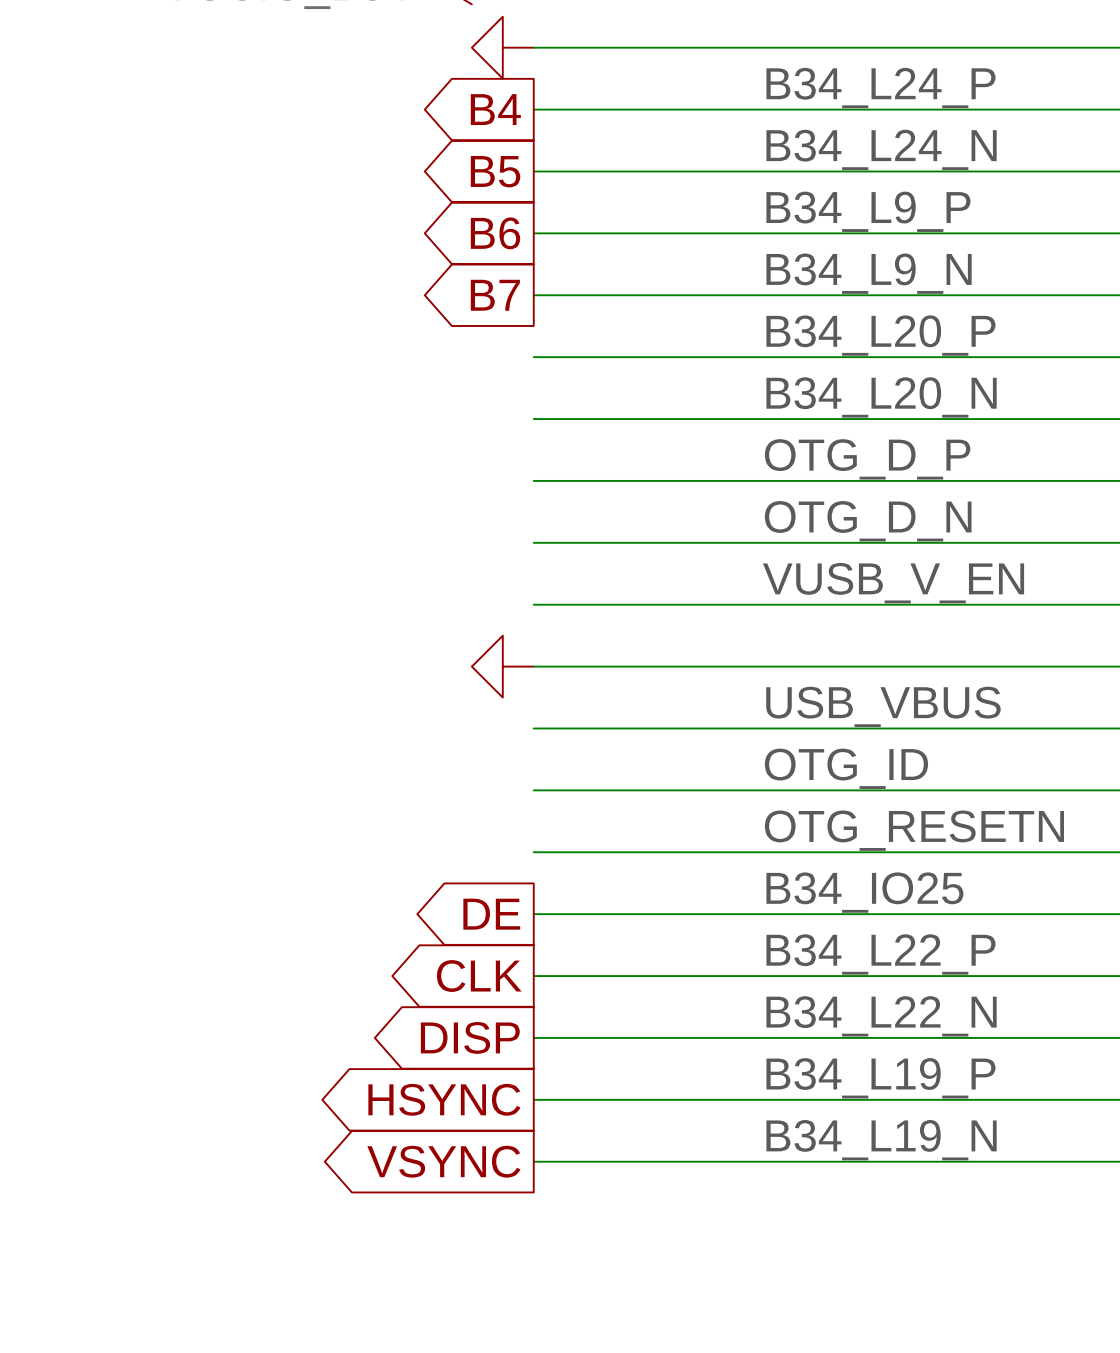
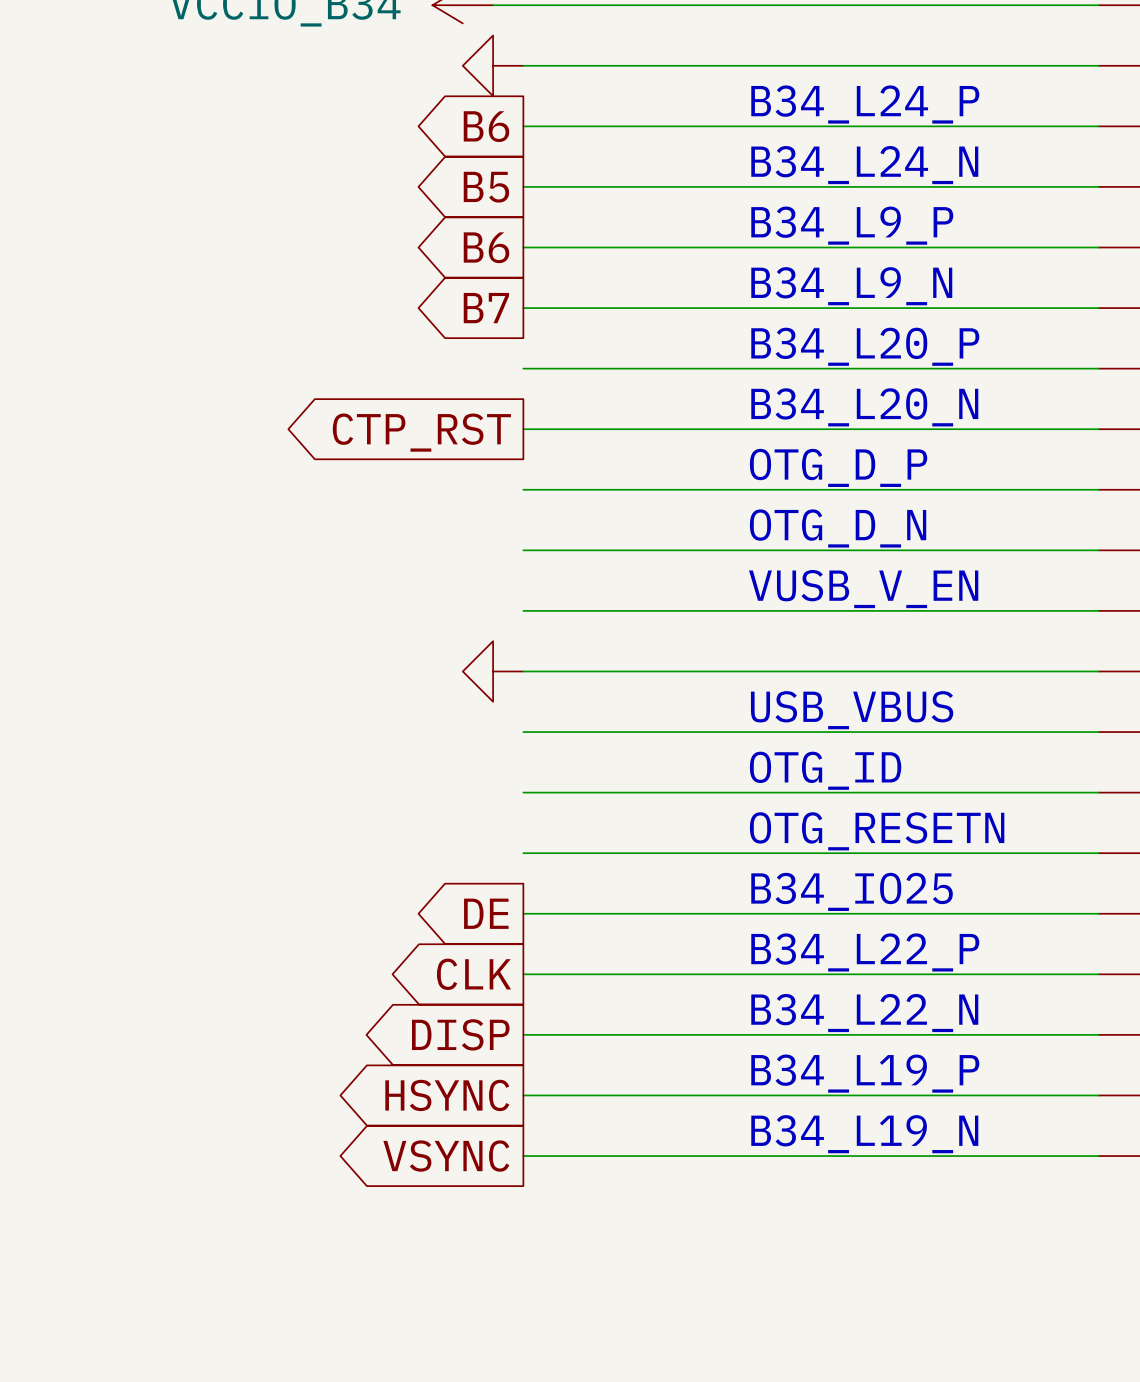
global label: B4 (495, 109) -> B6 (486, 126)
global label: none -> CTP_RST (421, 432)

